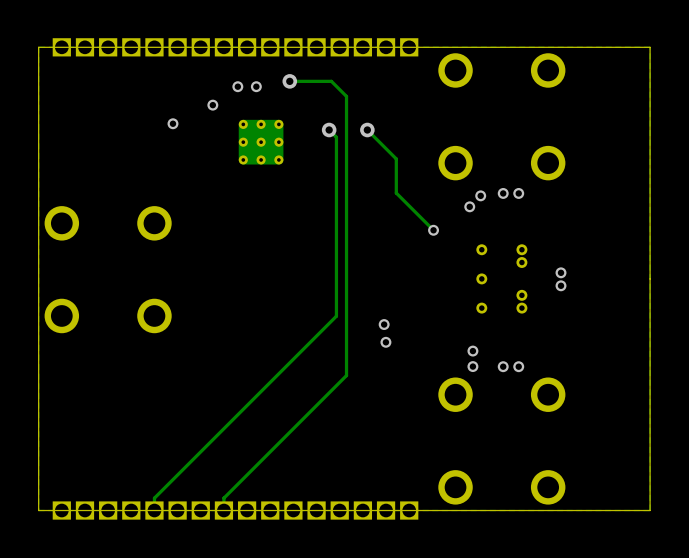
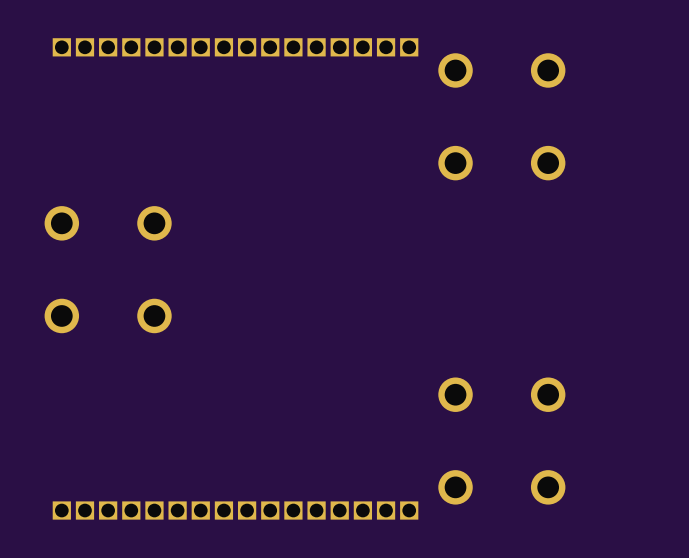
board edge: (650, 47) (650, 510) (38, 510) (38, 47) (650, 47) -> none
track: (289, 81) (331, 81) (346, 96) (346, 375) (223, 498) (223, 510) -> none
via: (289, 81) -> none
via: (237, 86) -> none
via: (256, 86) -> none
via: (212, 105) -> none
via: (172, 123) -> none
track: (329, 130) (336, 137) (336, 316) (154, 498) (154, 510) -> none
via: (329, 130) -> none
track: (367, 130) (396, 158) (396, 193) (433, 230) -> none
via: (367, 130) -> none
part: (261, 142) -> none
via: (503, 193) -> none
via: (518, 193) -> none
via: (480, 195) -> none
via: (469, 206) -> none
via: (433, 230) -> none
via: (561, 272) -> none
part: (501, 278) -> none
via: (561, 285) -> none
via: (384, 324) -> none
via: (385, 342) -> none
via: (472, 351) -> none
via: (472, 366) -> none
via: (503, 366) -> none
via: (518, 366) -> none

